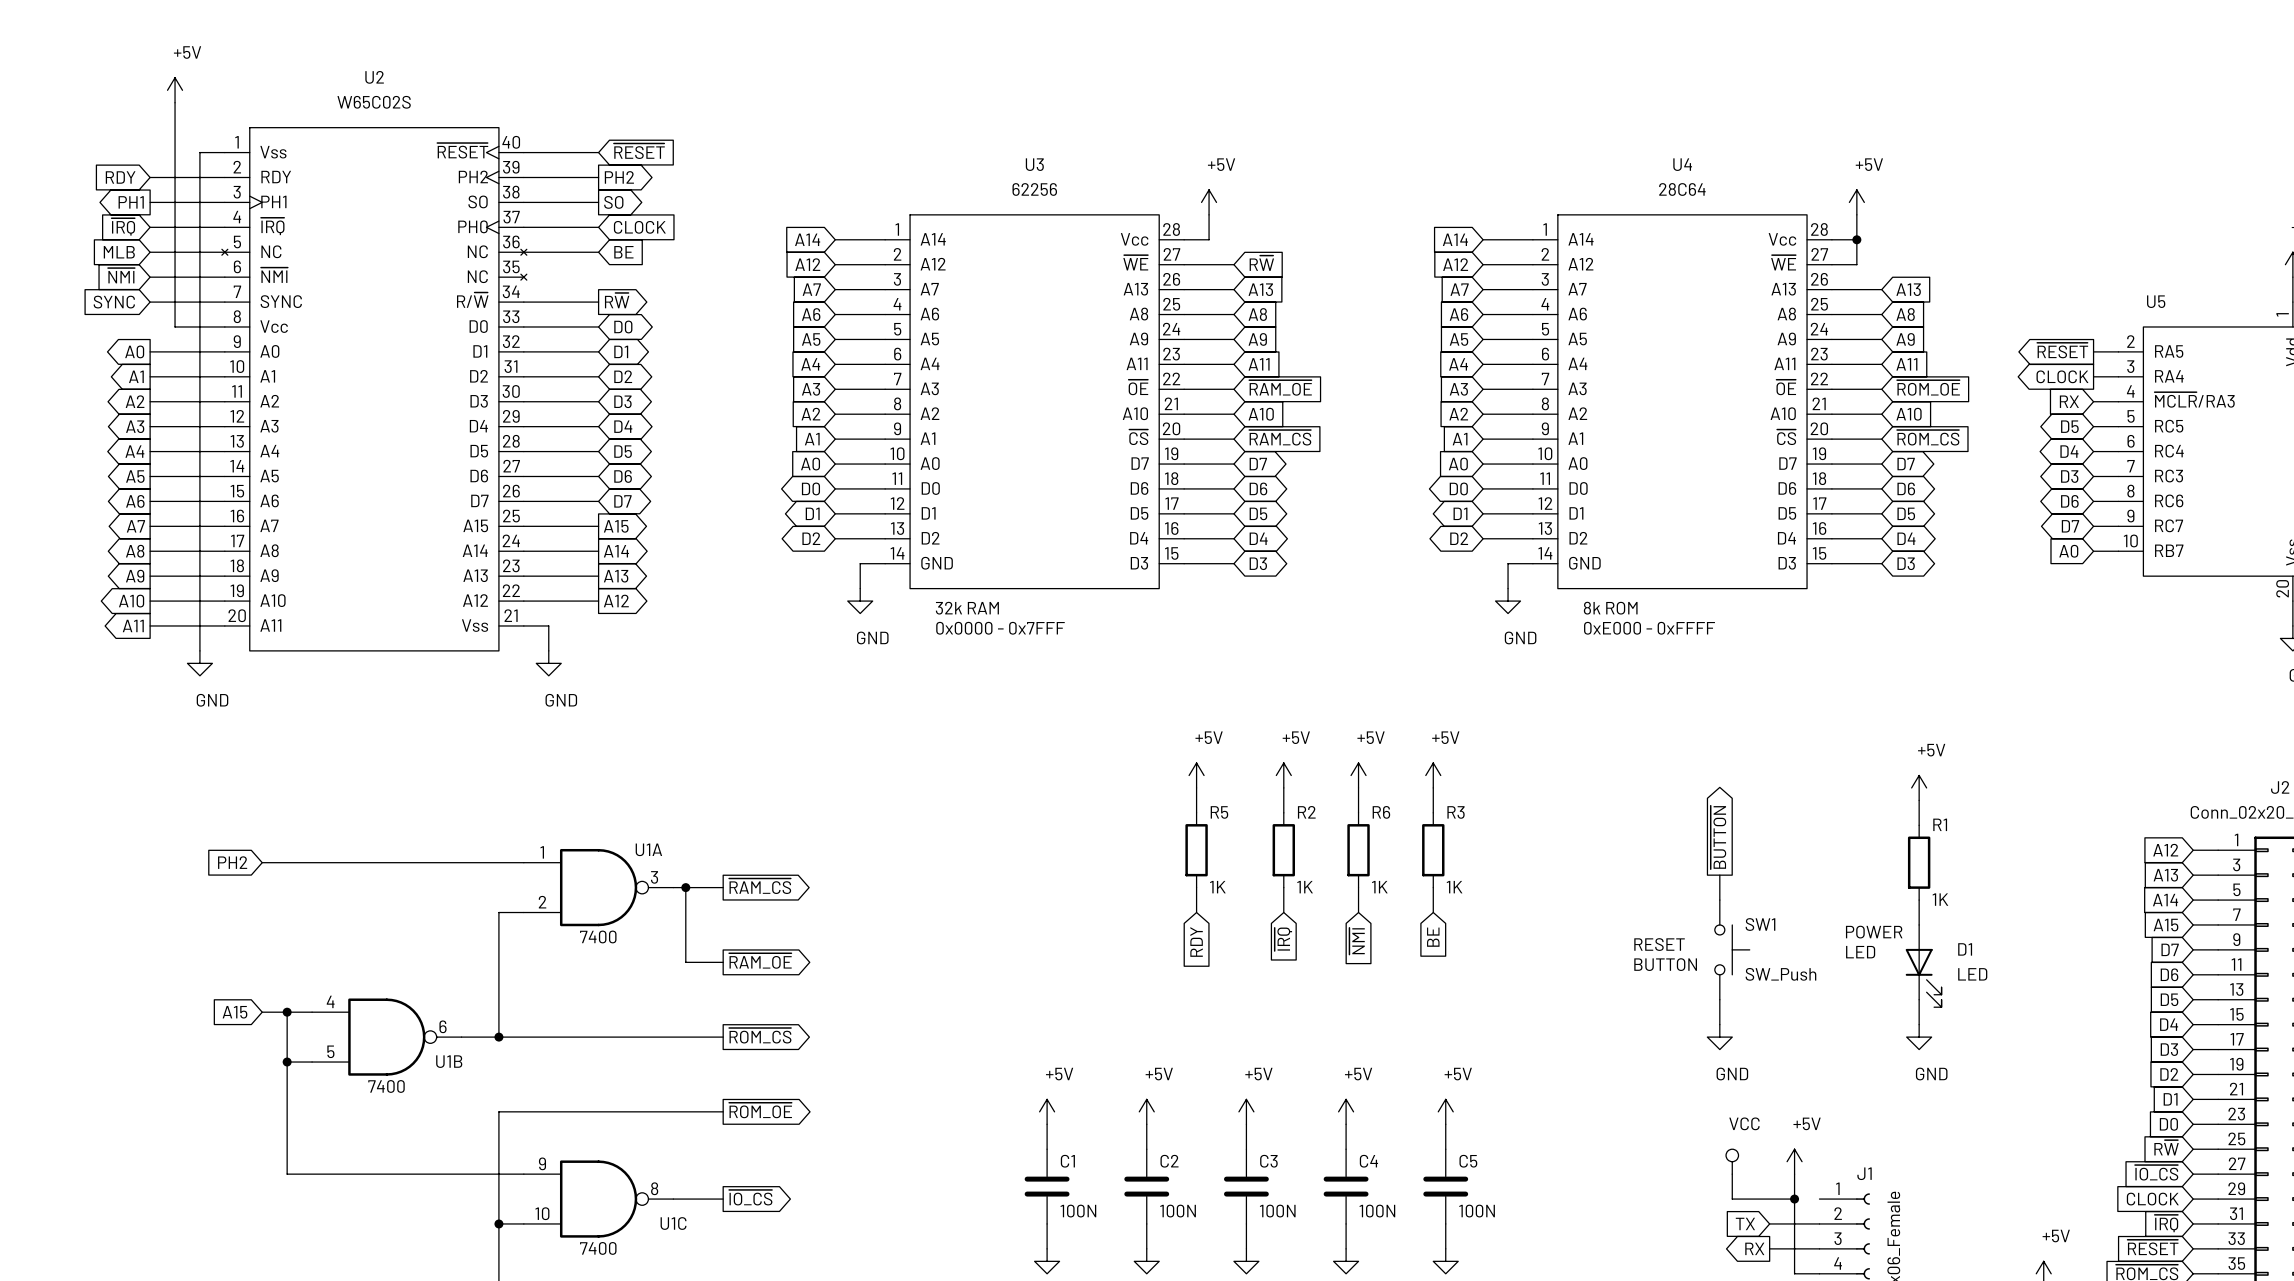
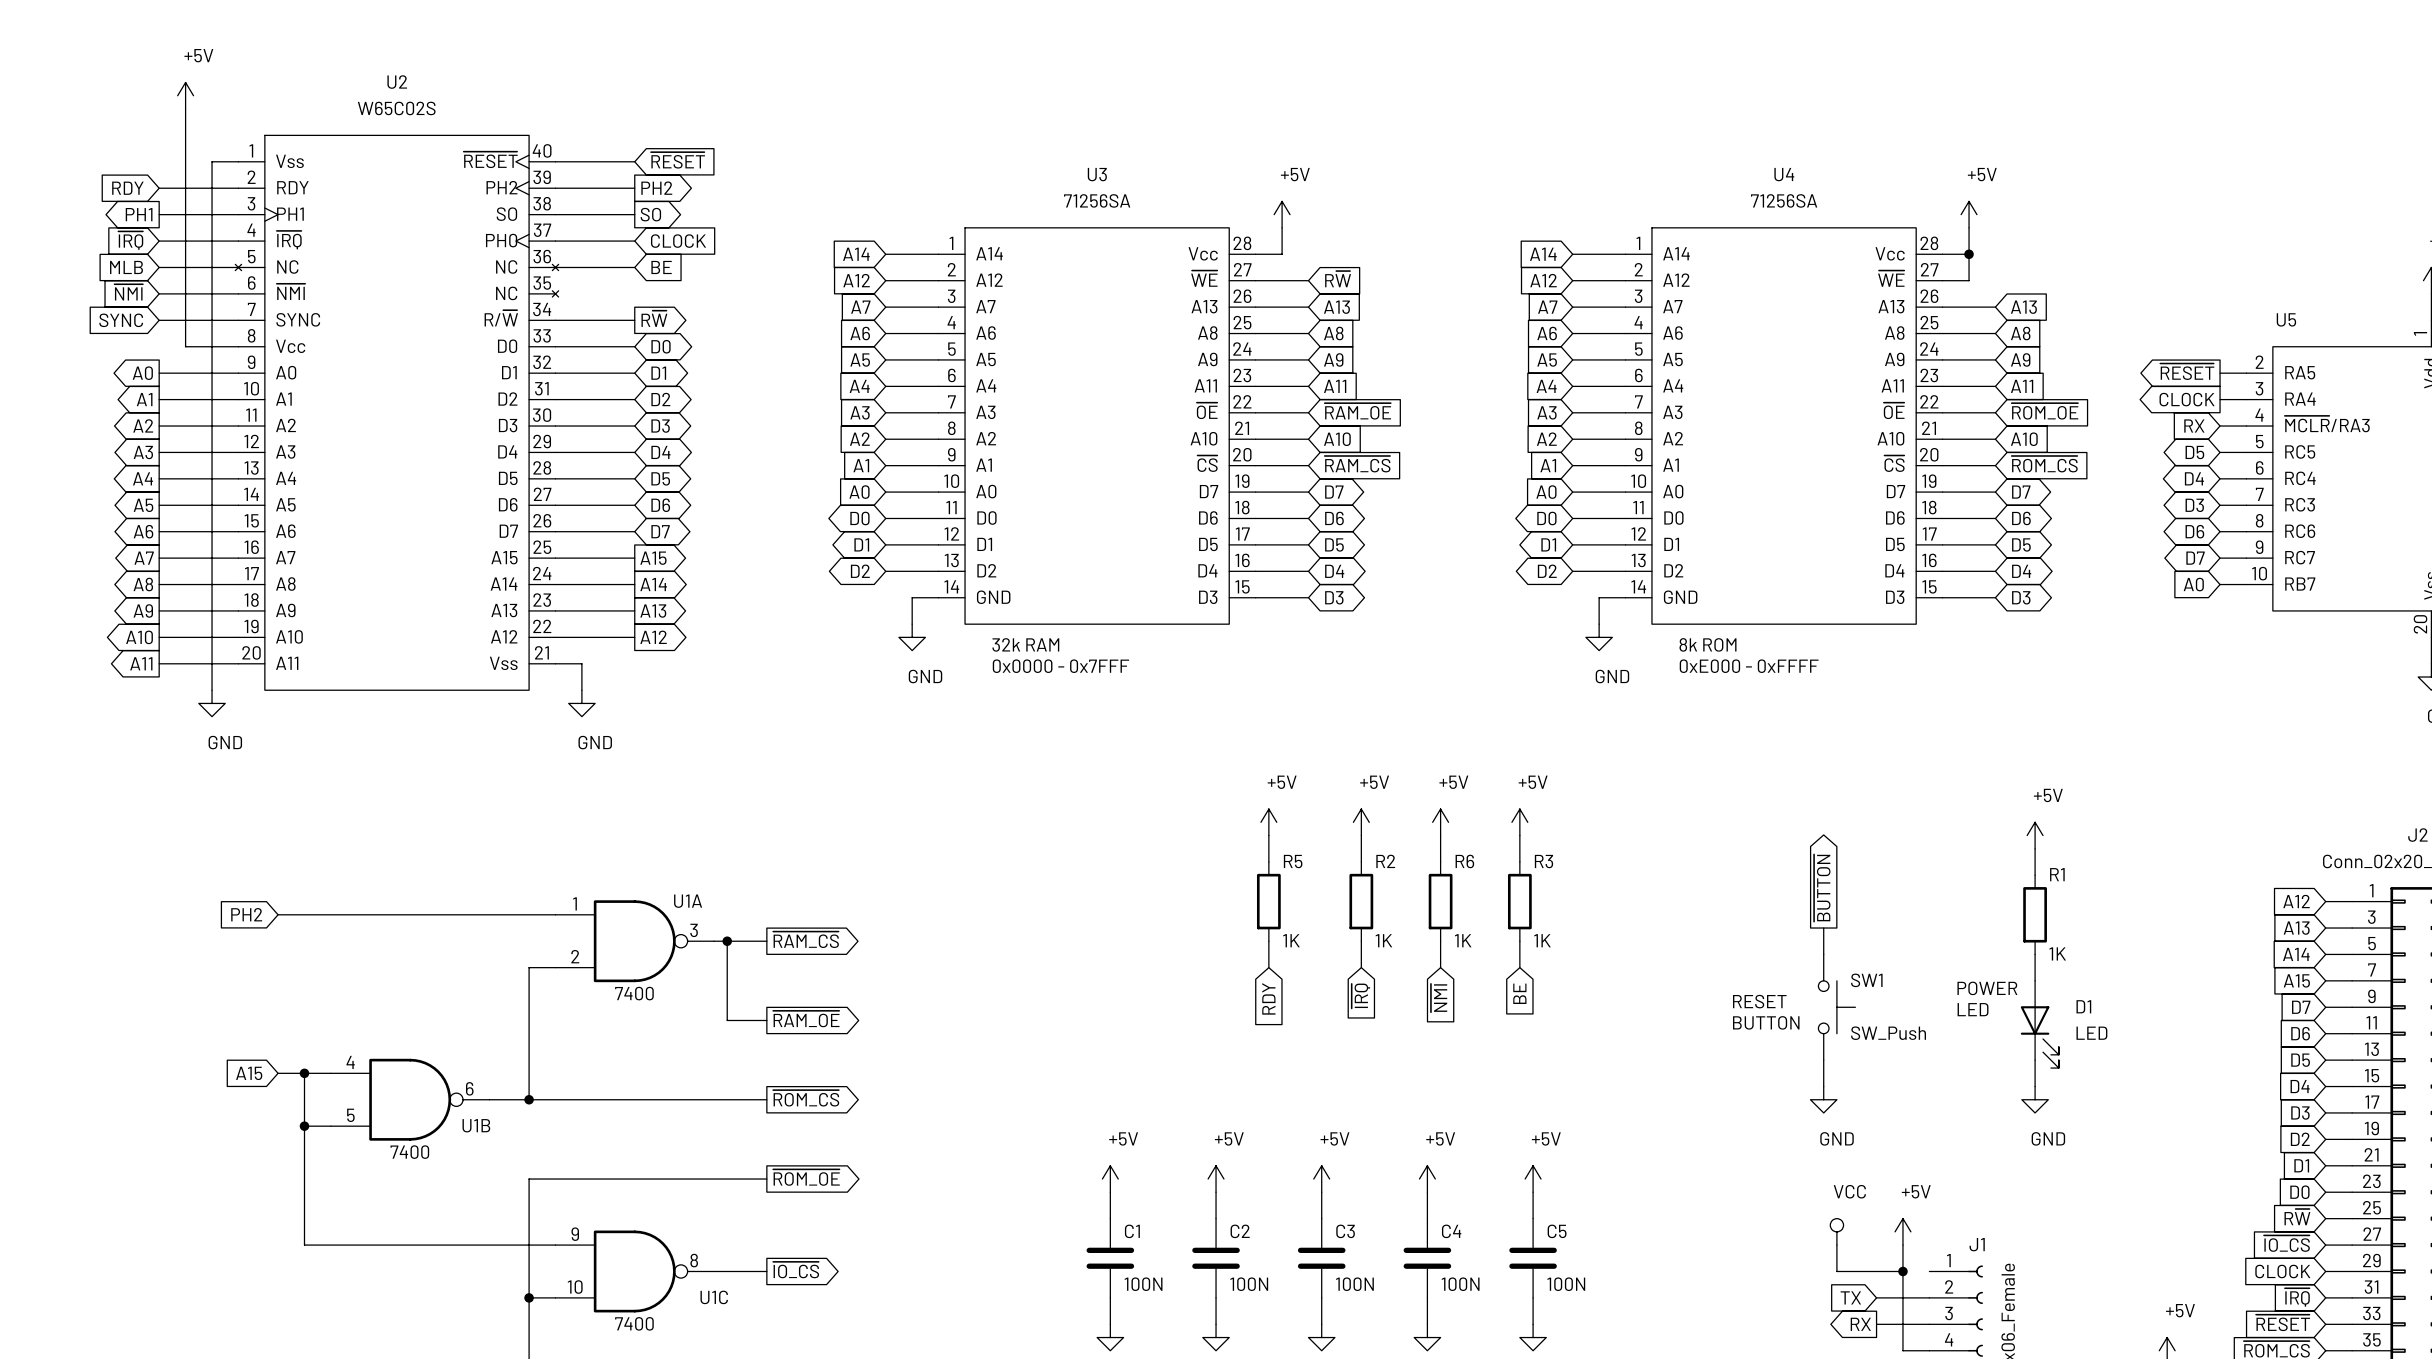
U3 value: 62256 (1034, 189) -> 71256SA (1097, 200)
U4 value: 28C64 (1682, 189) -> 71256SA (1784, 200)

